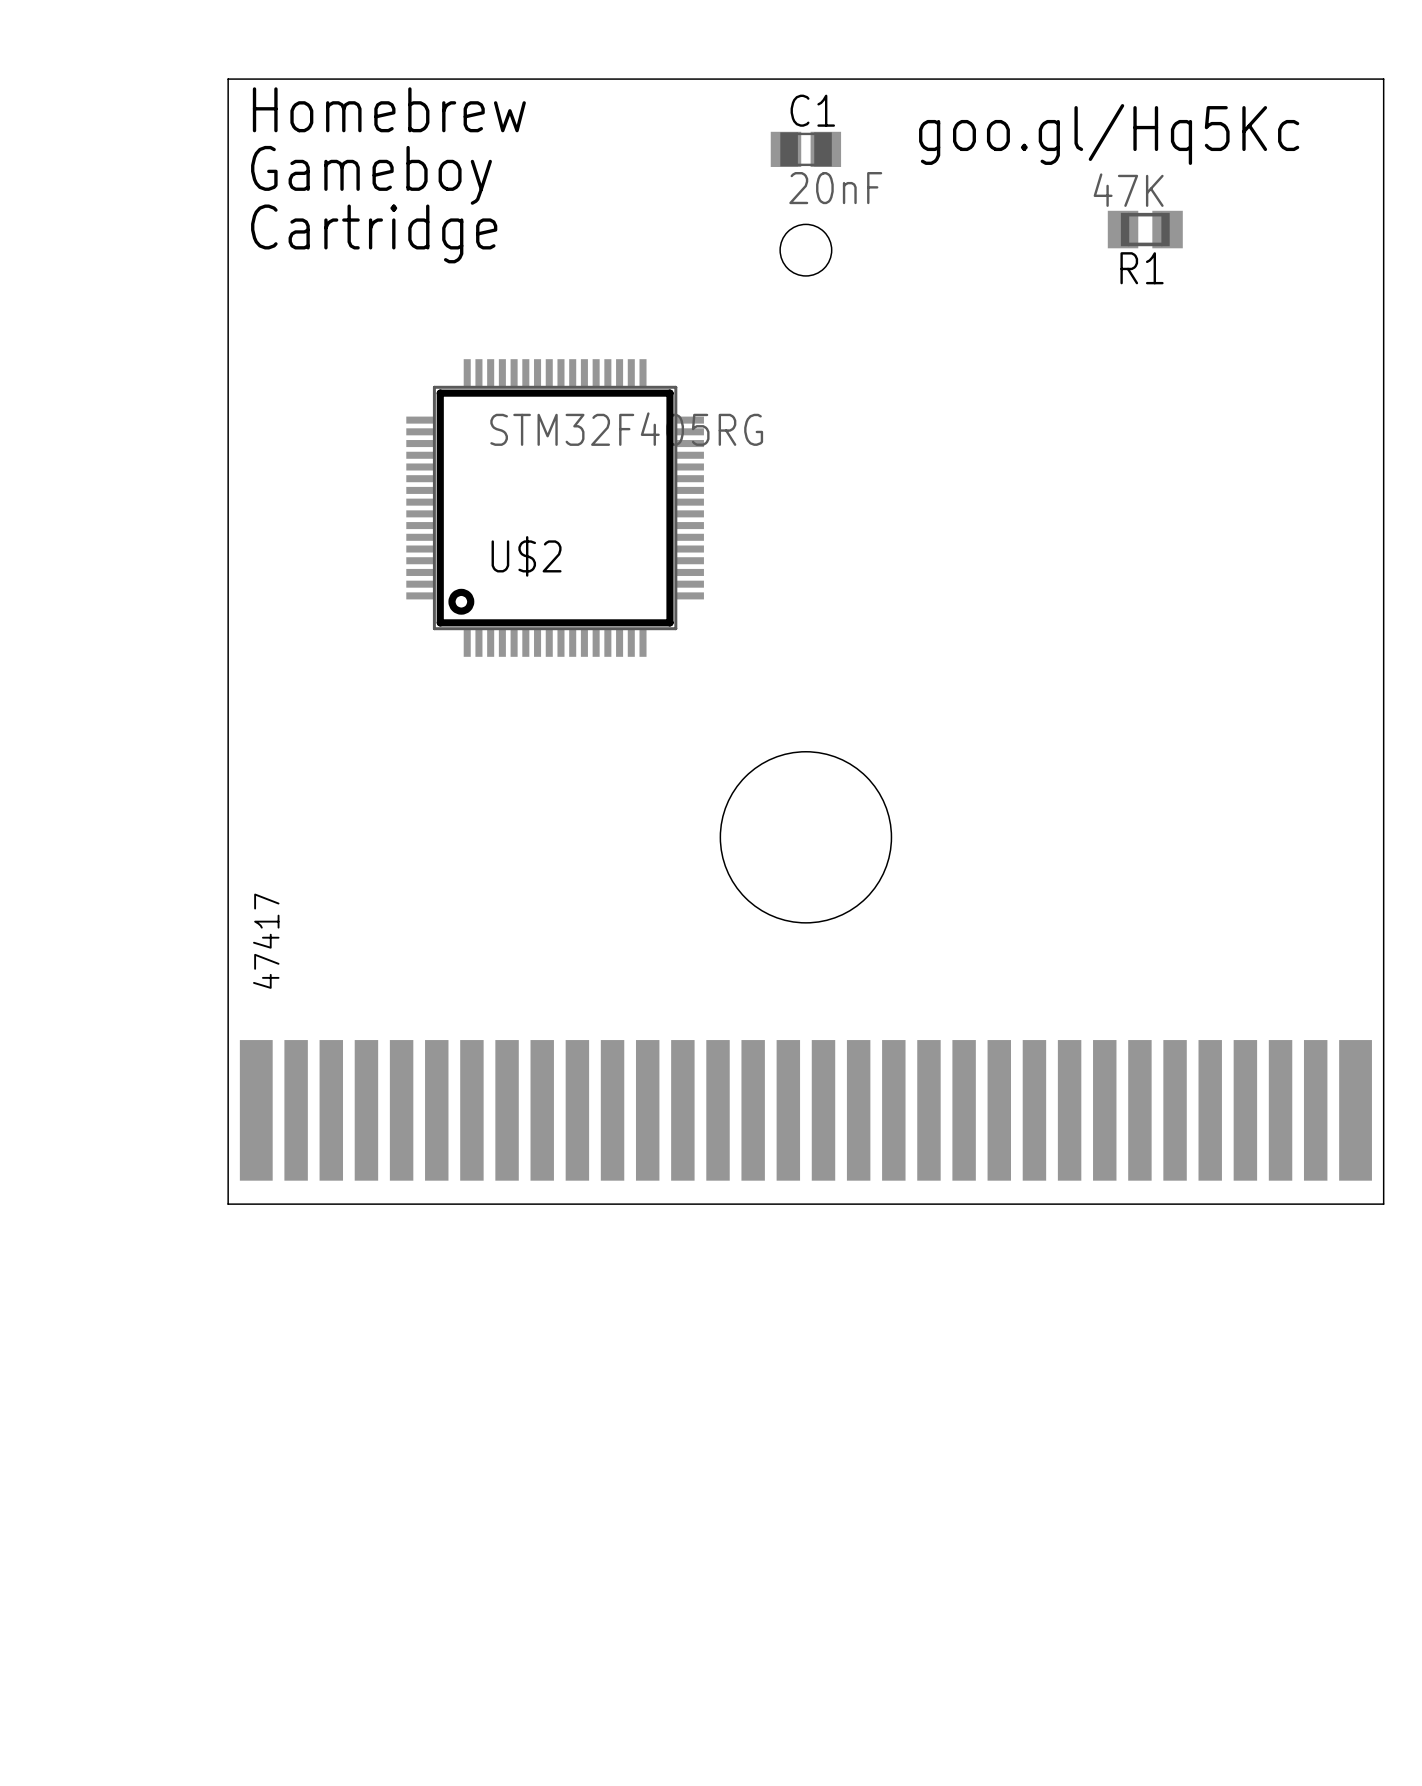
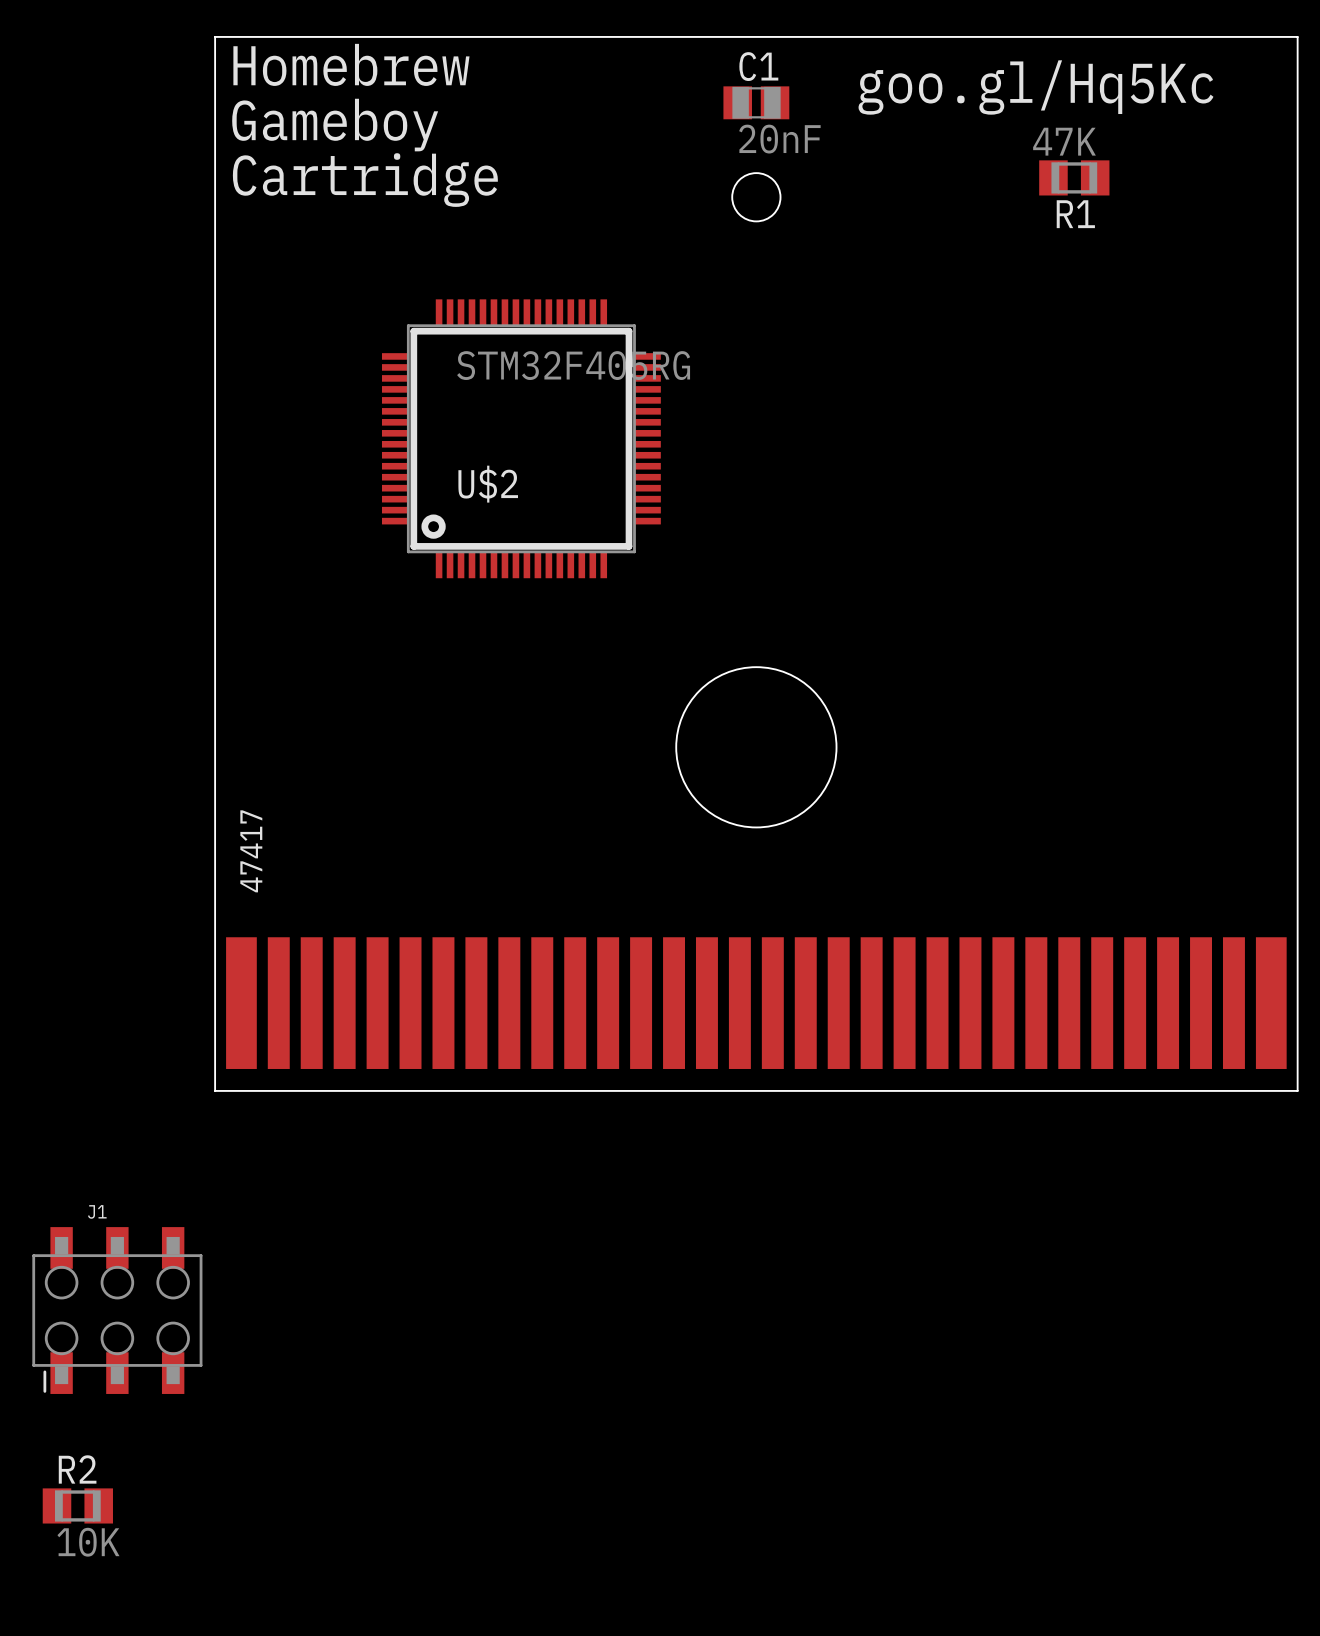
J1: none -> (117, 1310)
R2: none -> 10K (77, 1505)

